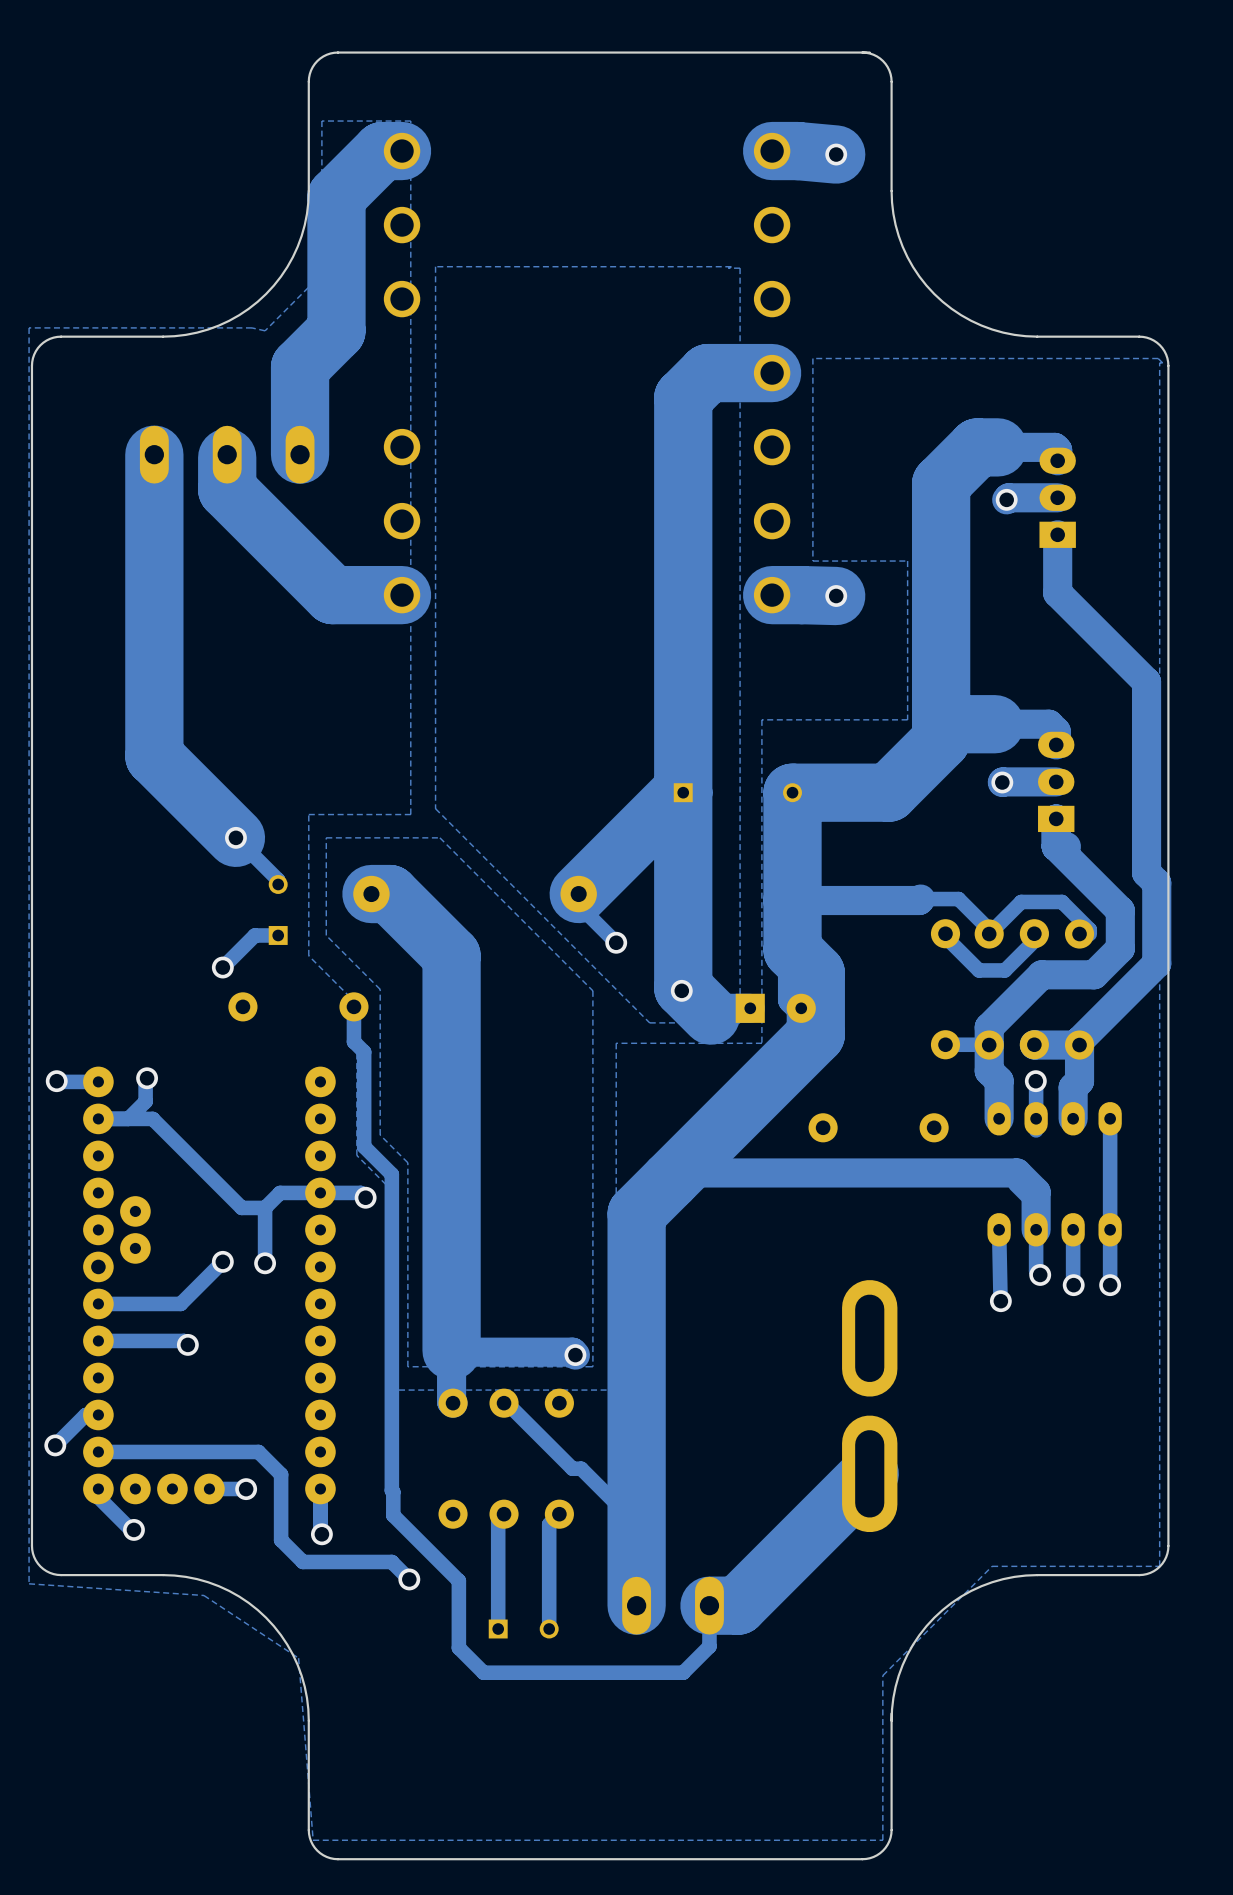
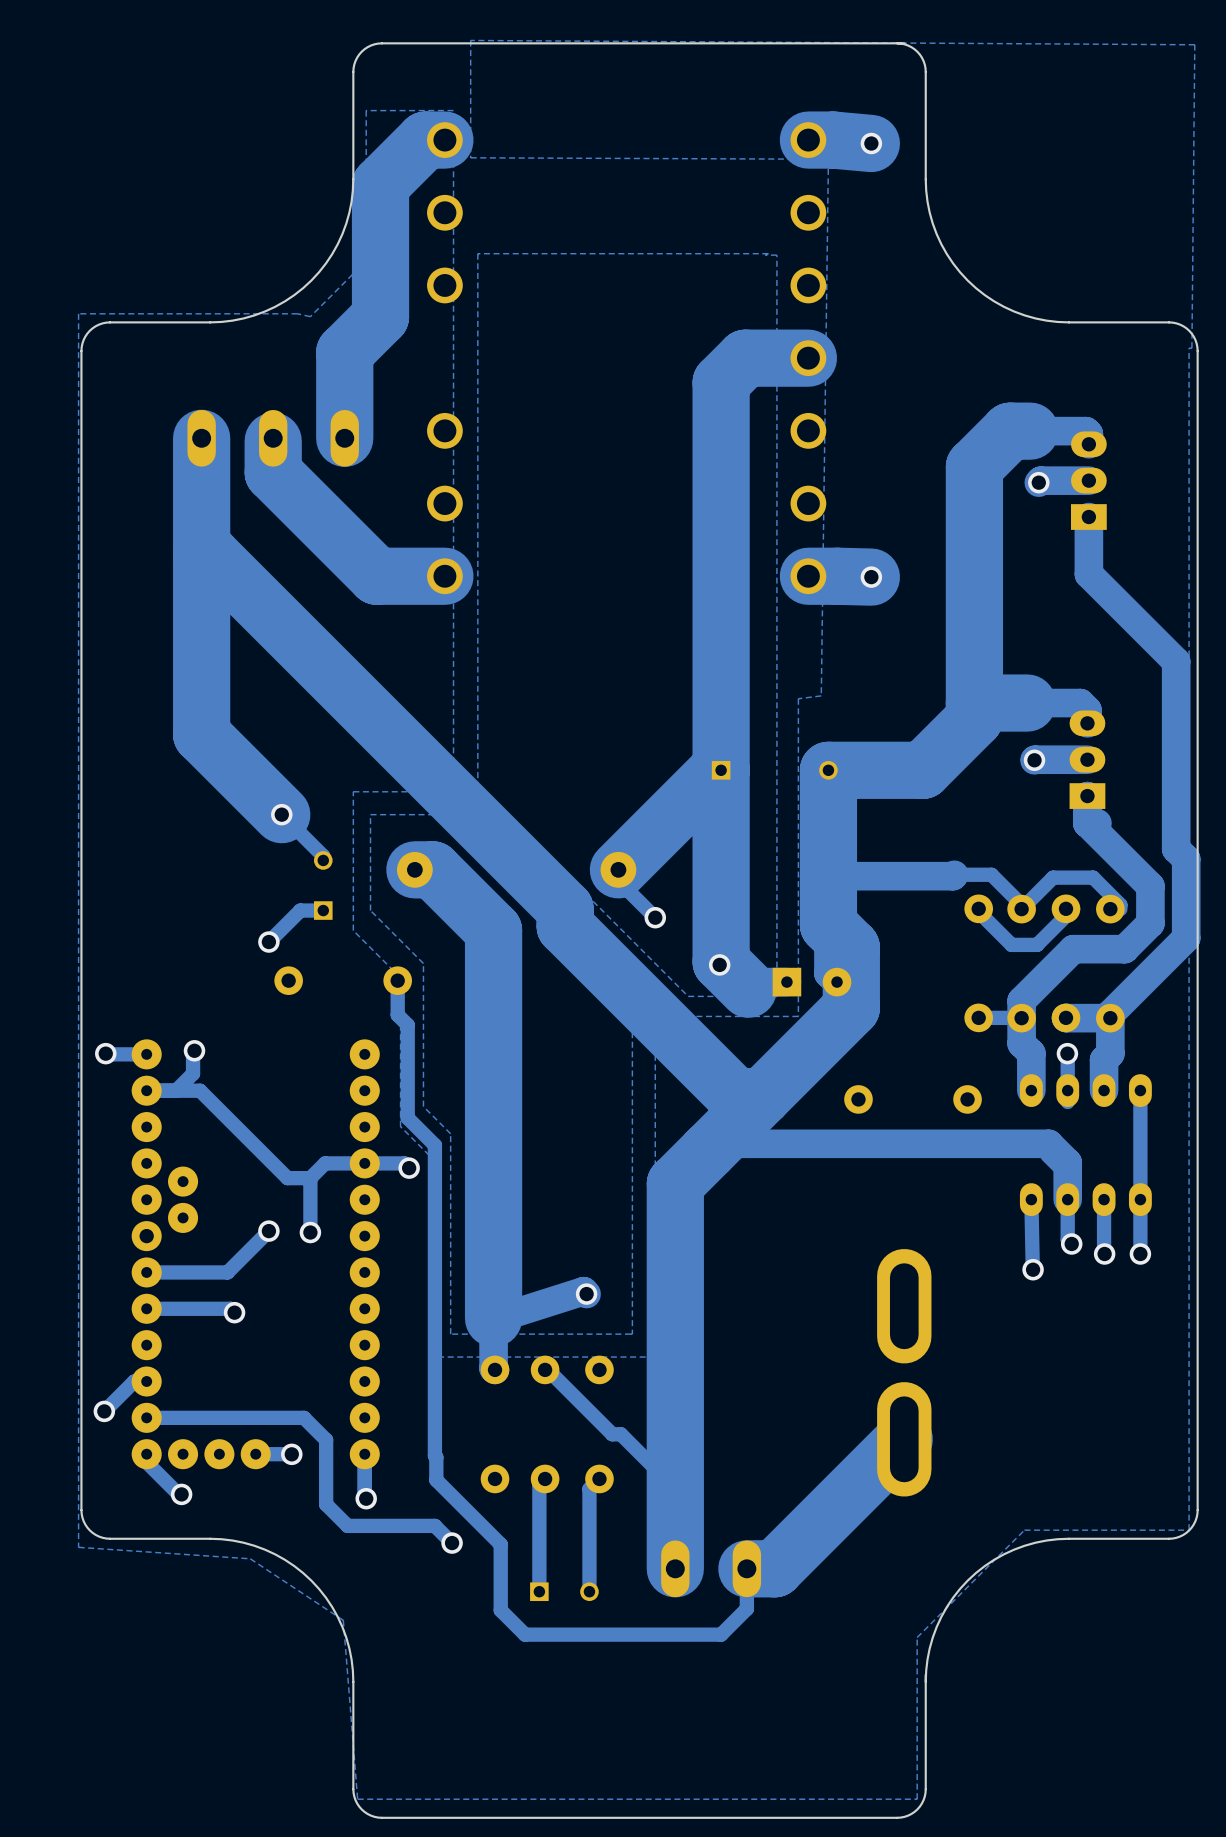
zone outline: (1162, 362) (1158, 358) (812, 358) (812, 561) (907, 561) (907, 719) (761, 719) -> (1191, 348) (1194, 44) (470, 40) (470, 157) (828, 159) (821, 695) (798, 698)
track: none -> (201, 554) (210, 554) (565, 909) (565, 926) (735, 1096) (762, 1096)
track: (451, 1352) (572, 1352) (575, 1355) -> (493, 1319) (583, 1291) (586, 1294)
via position: (575, 1355) -> (586, 1294)

